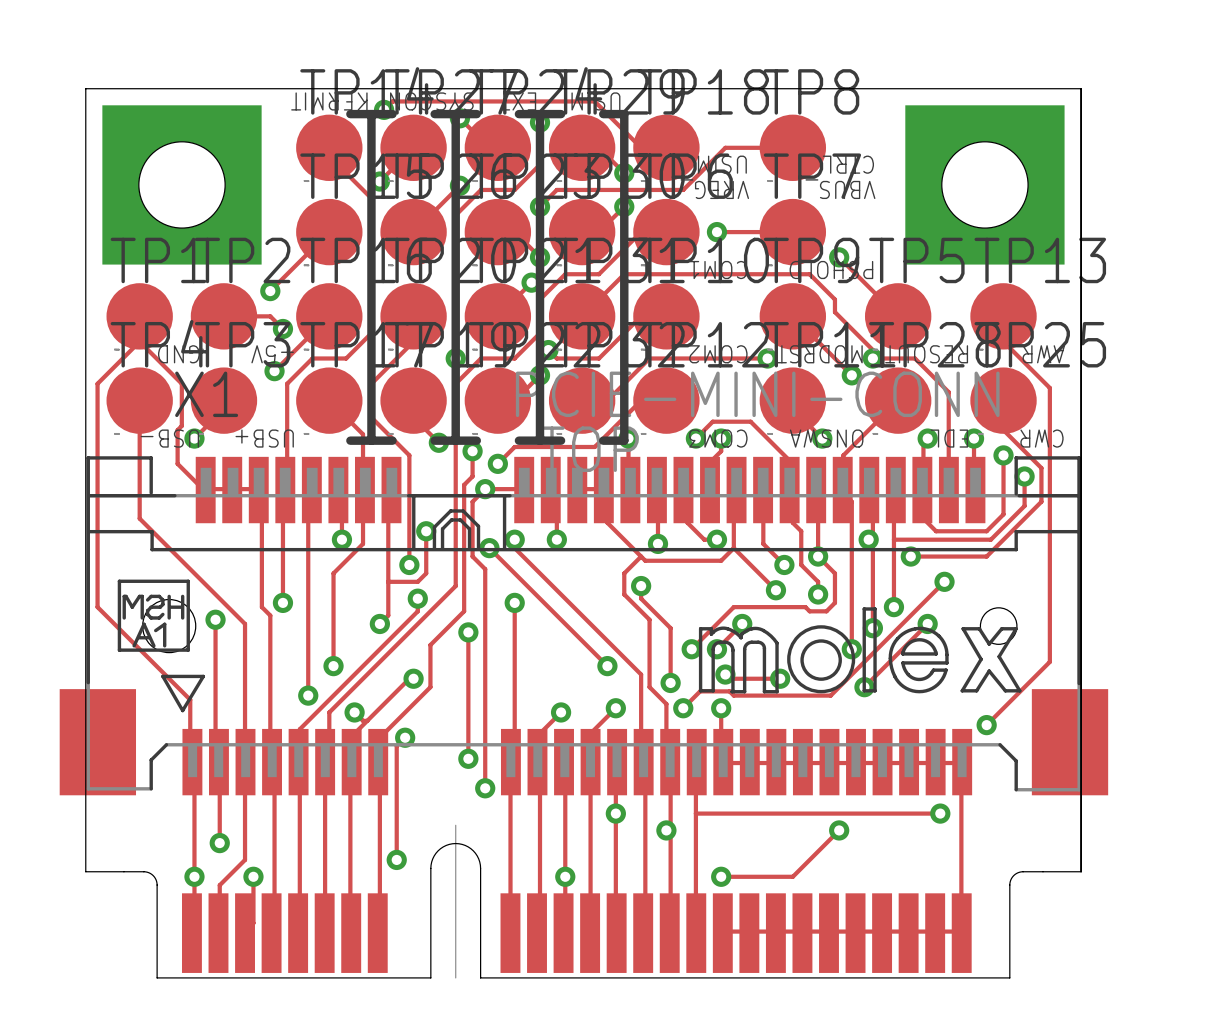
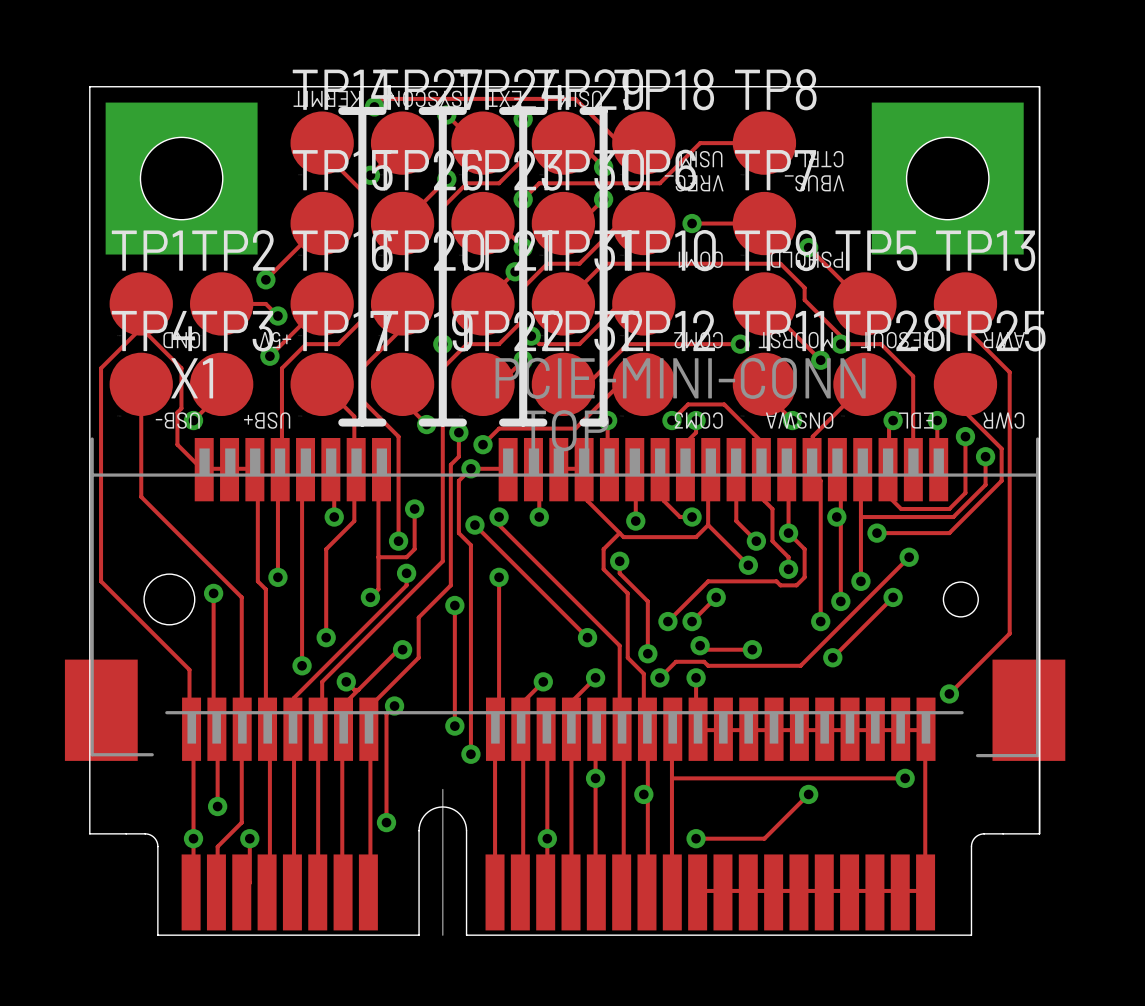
X1 footprint: [59, 456, 1109, 796] -> [64, 437, 1066, 761]

